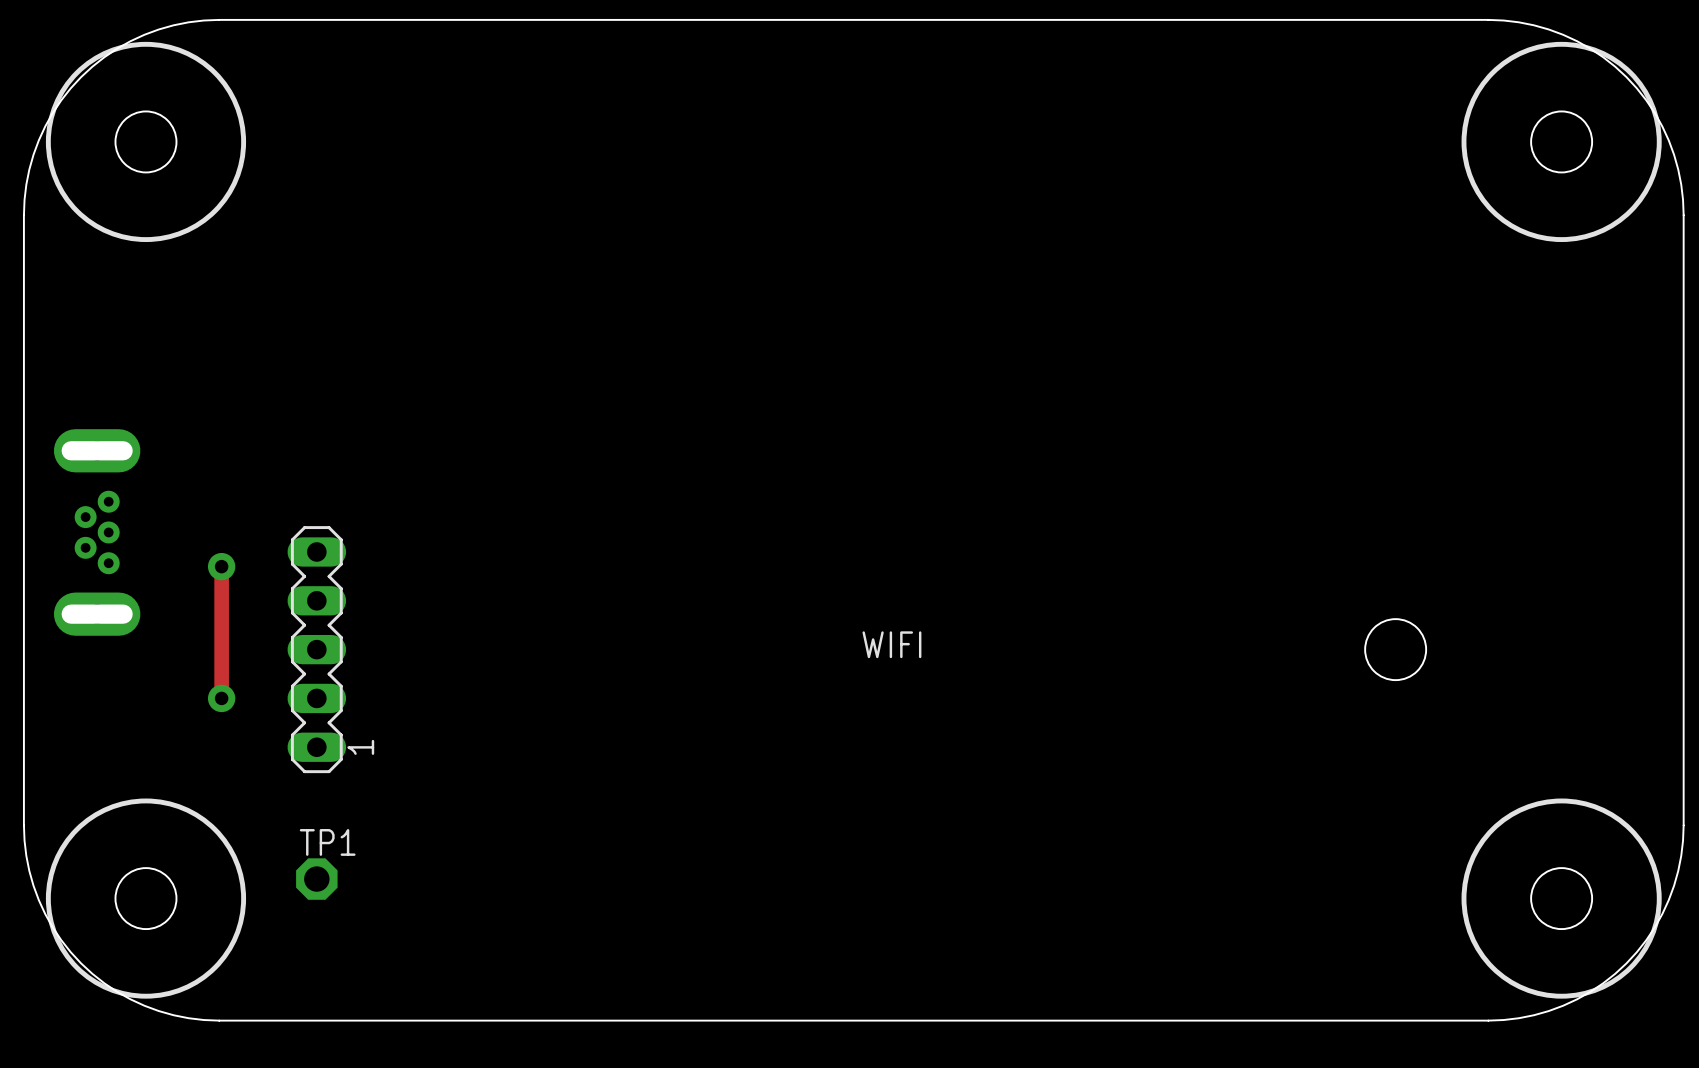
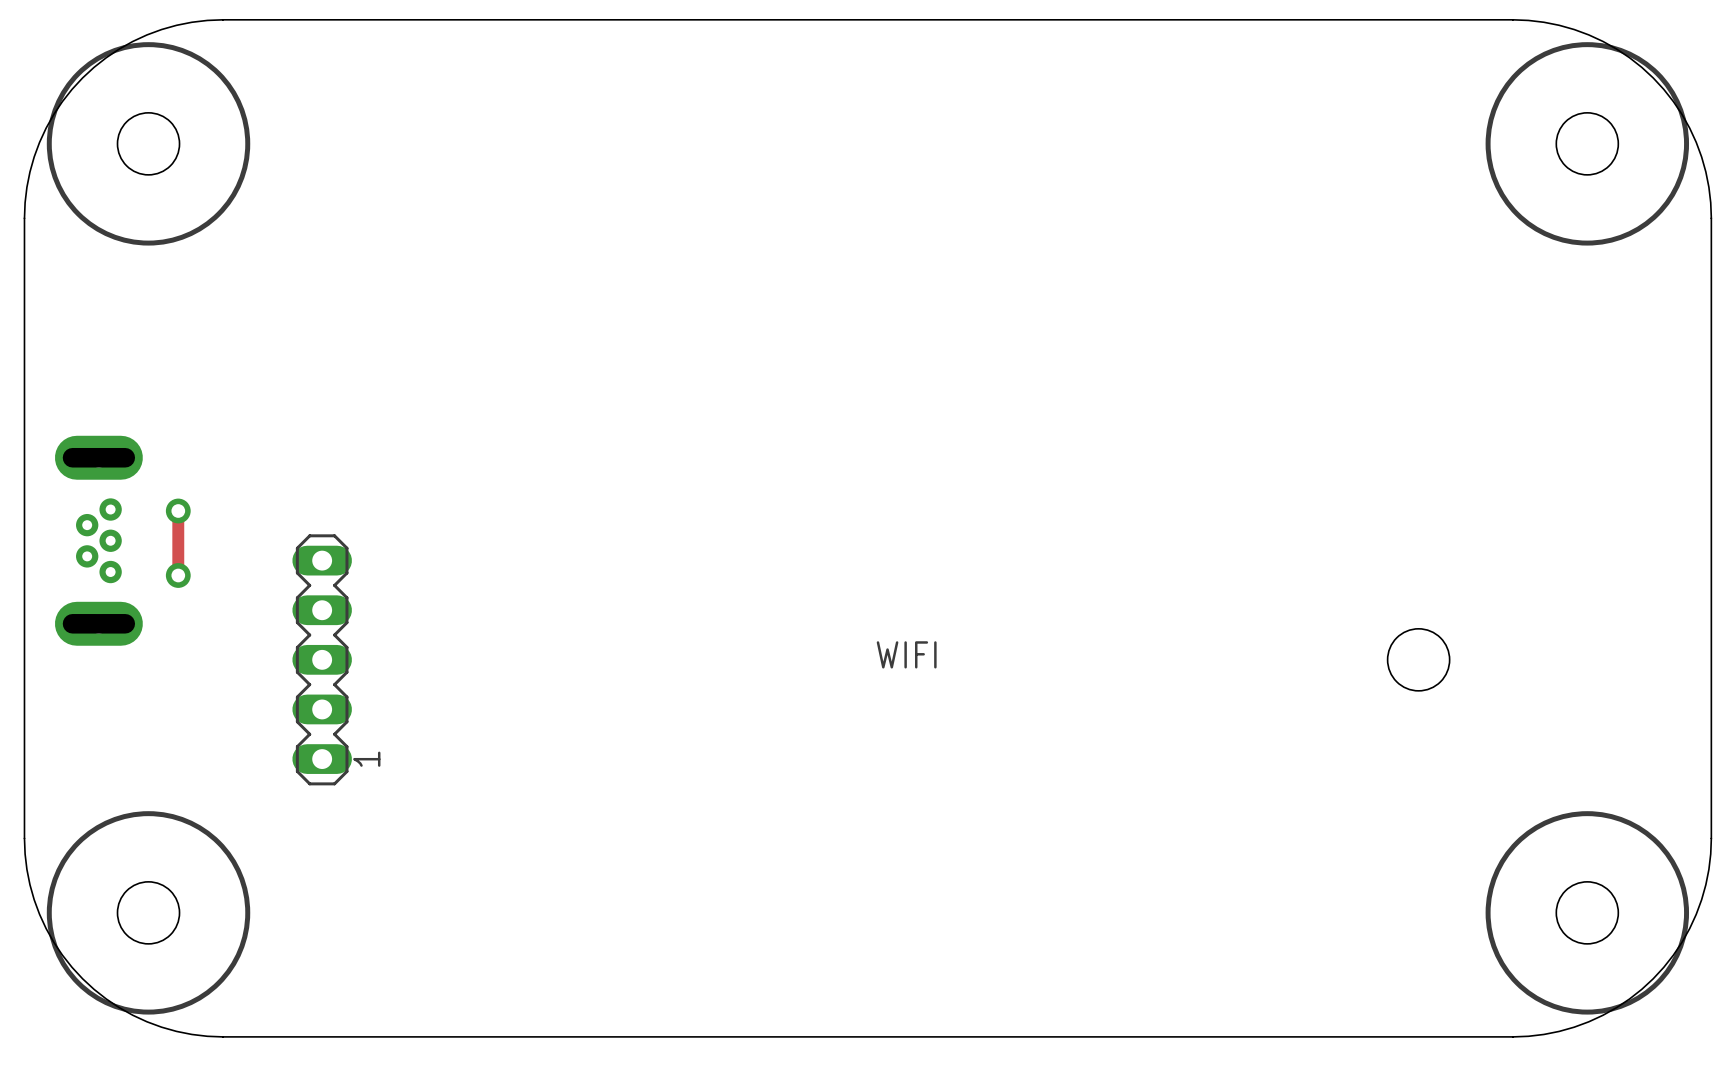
track: none -> (178, 511) (178, 575)
via: none -> (178, 511)
via: none -> (178, 575)
track: (221, 566) (221, 698) -> none
via: (221, 566) -> none
via: (221, 698) -> none
TP1: (316, 879) -> none

